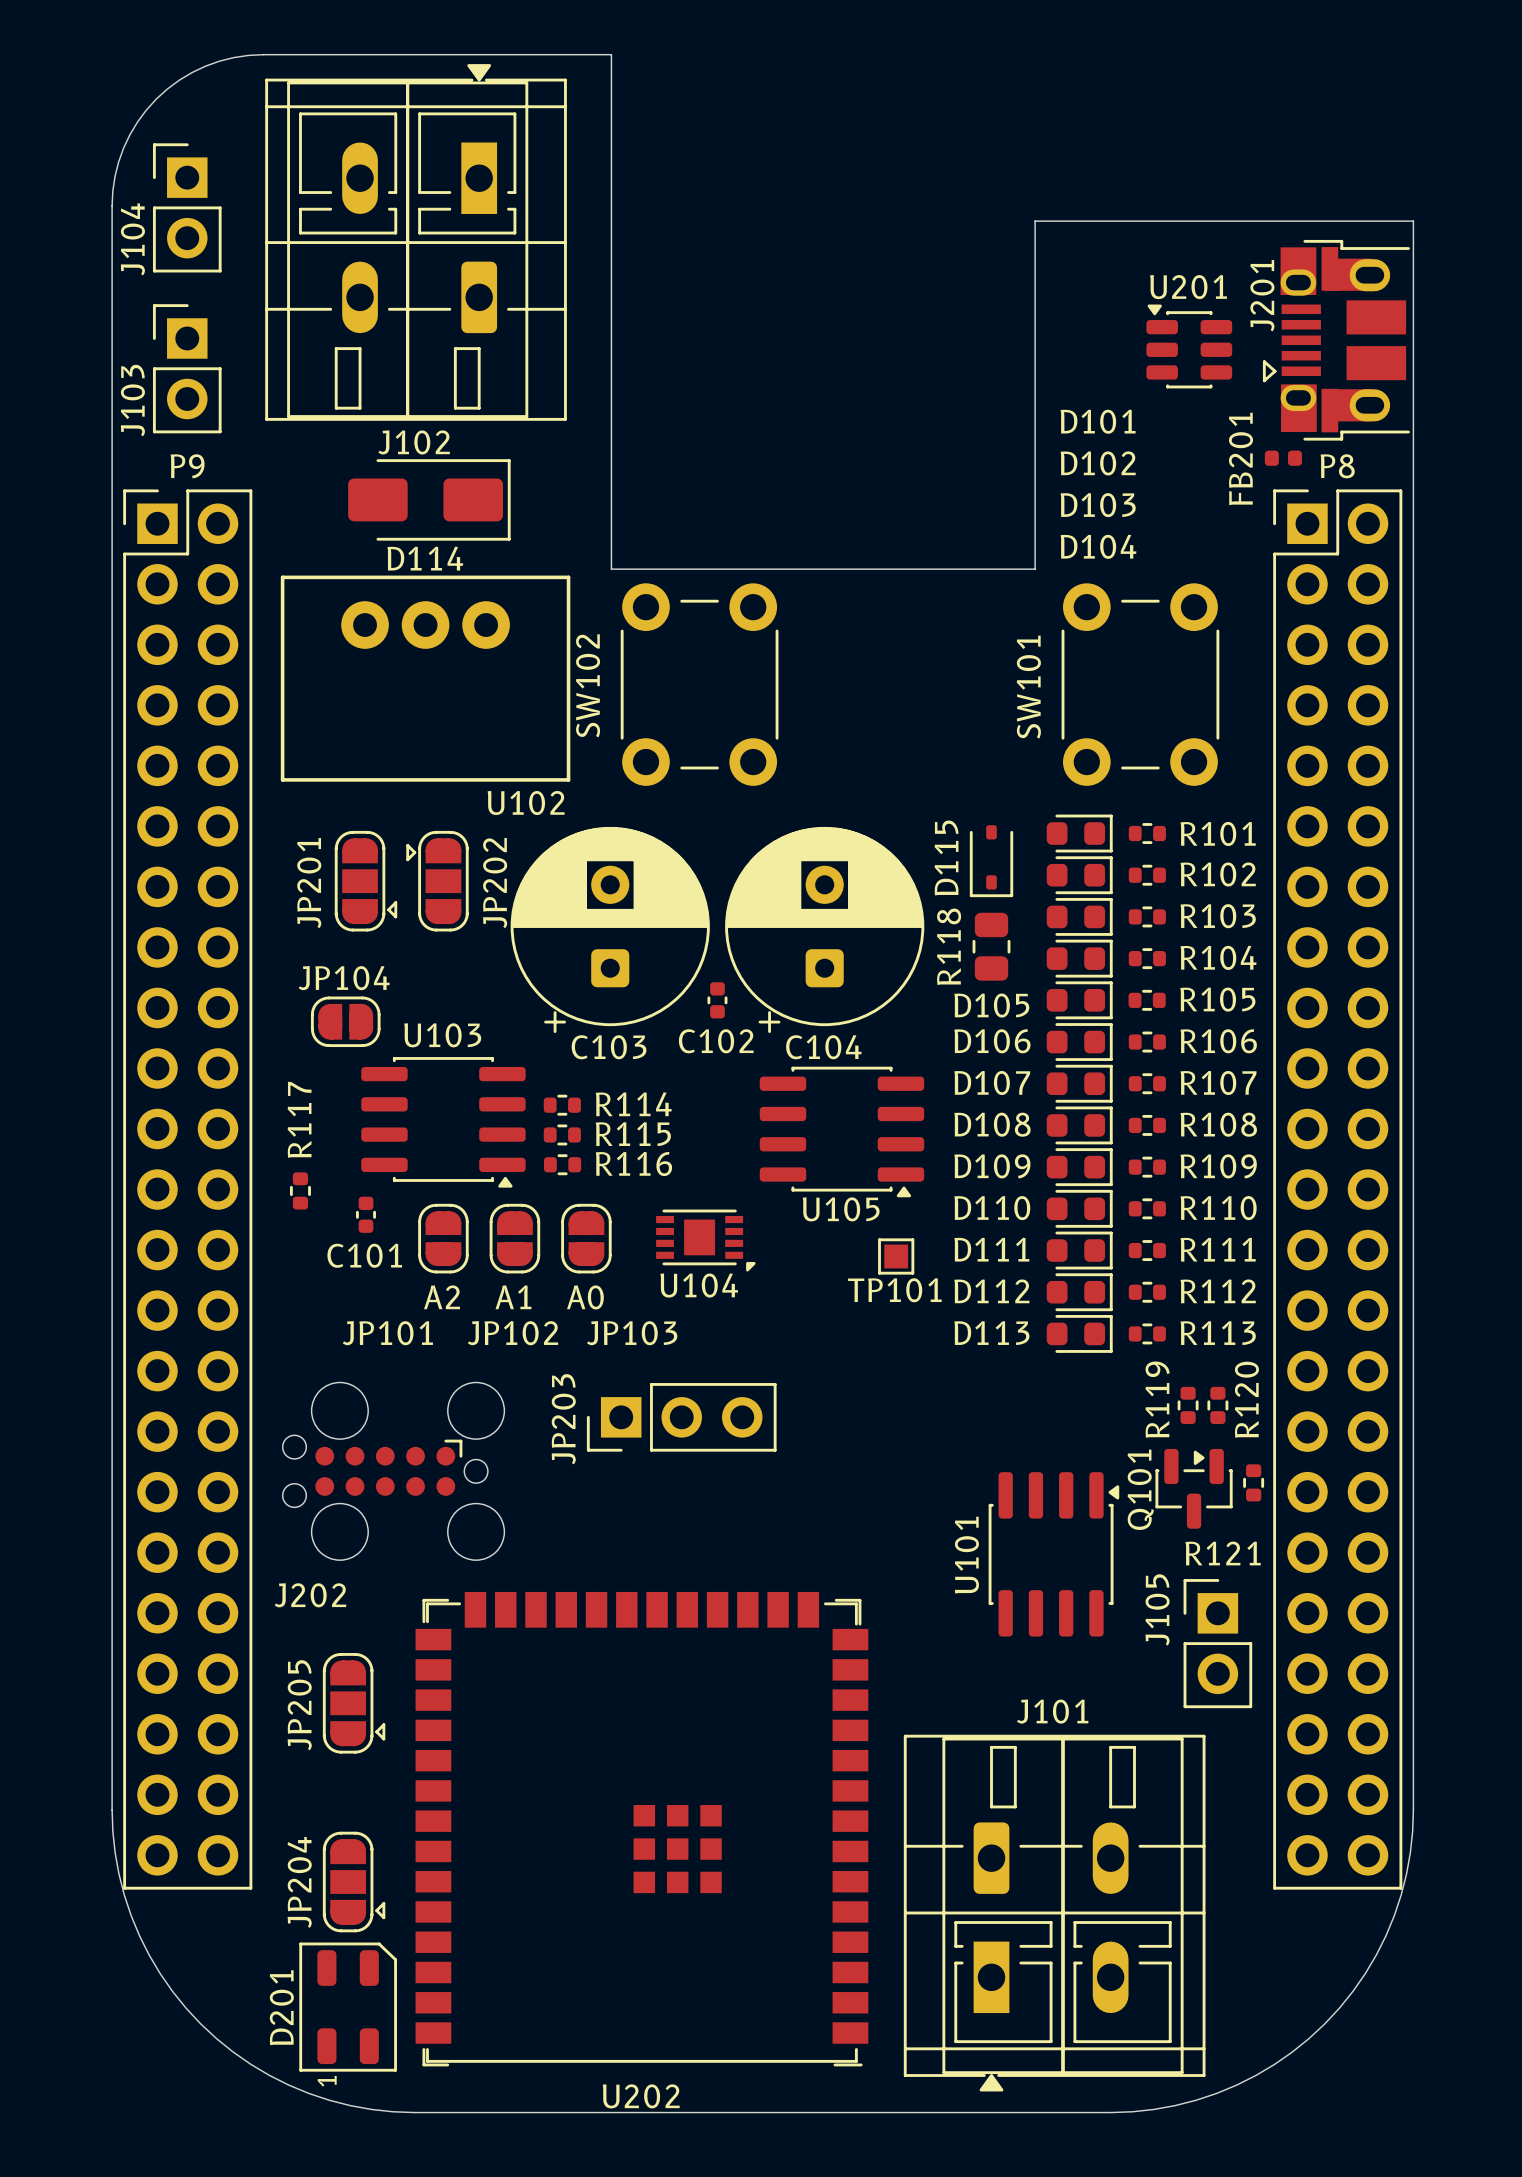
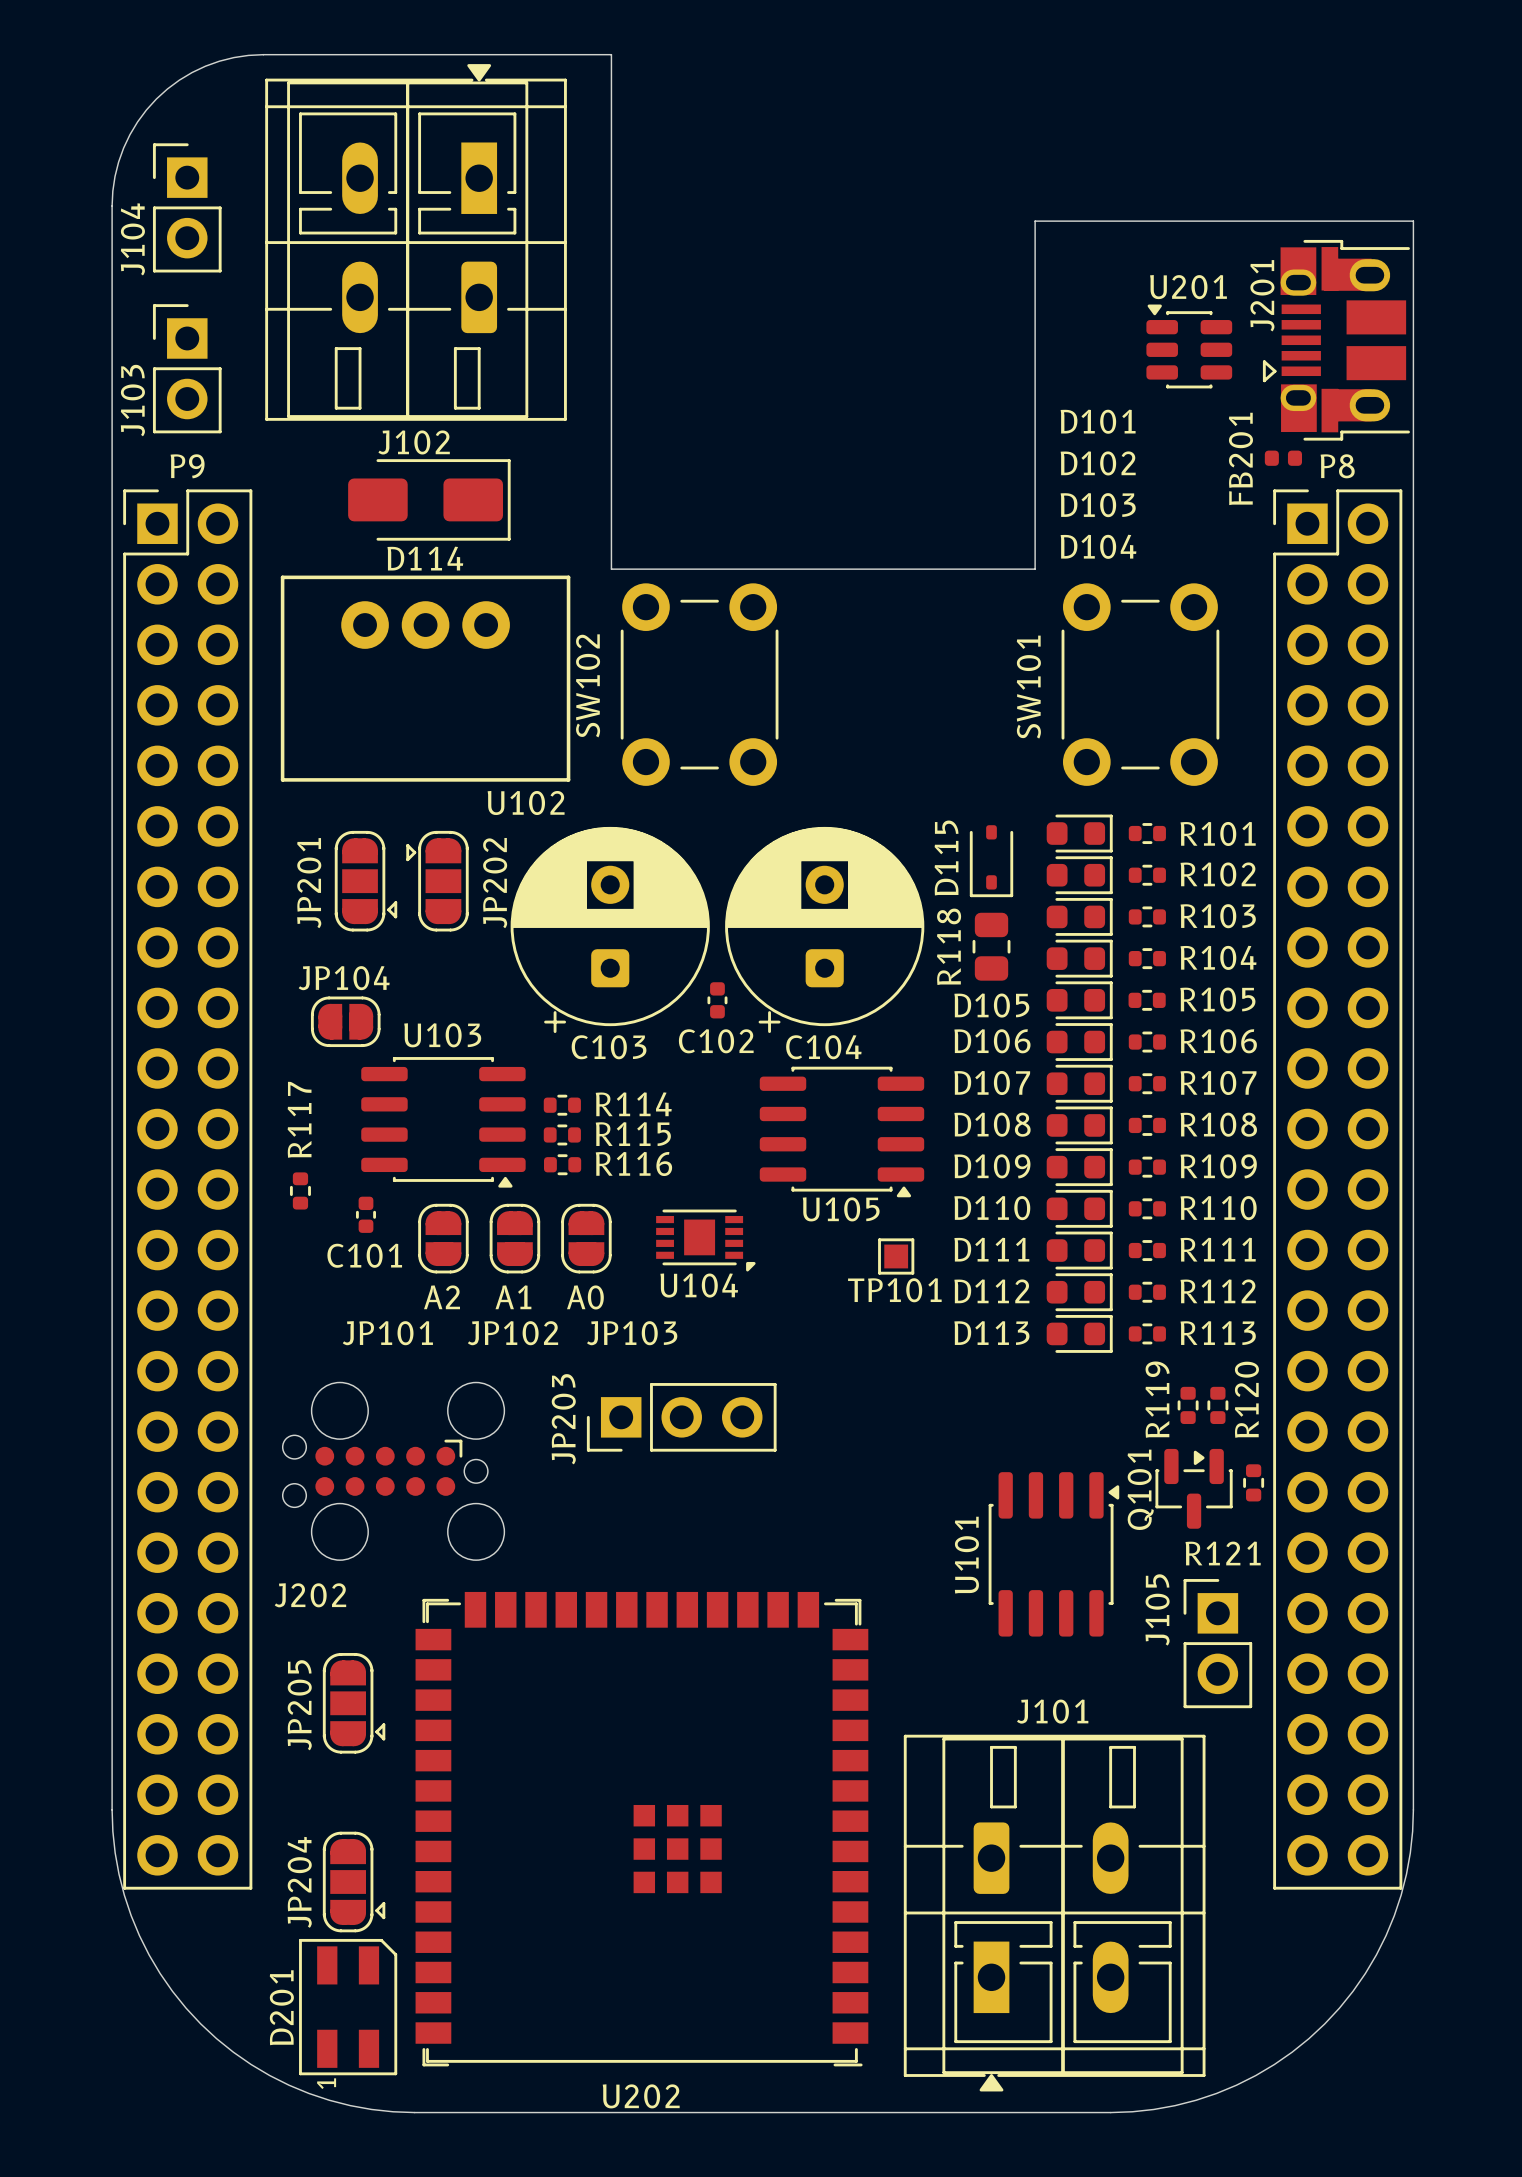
D201 footprint: [299, 1942, 397, 2072] -> [299, 1938, 398, 2076]

